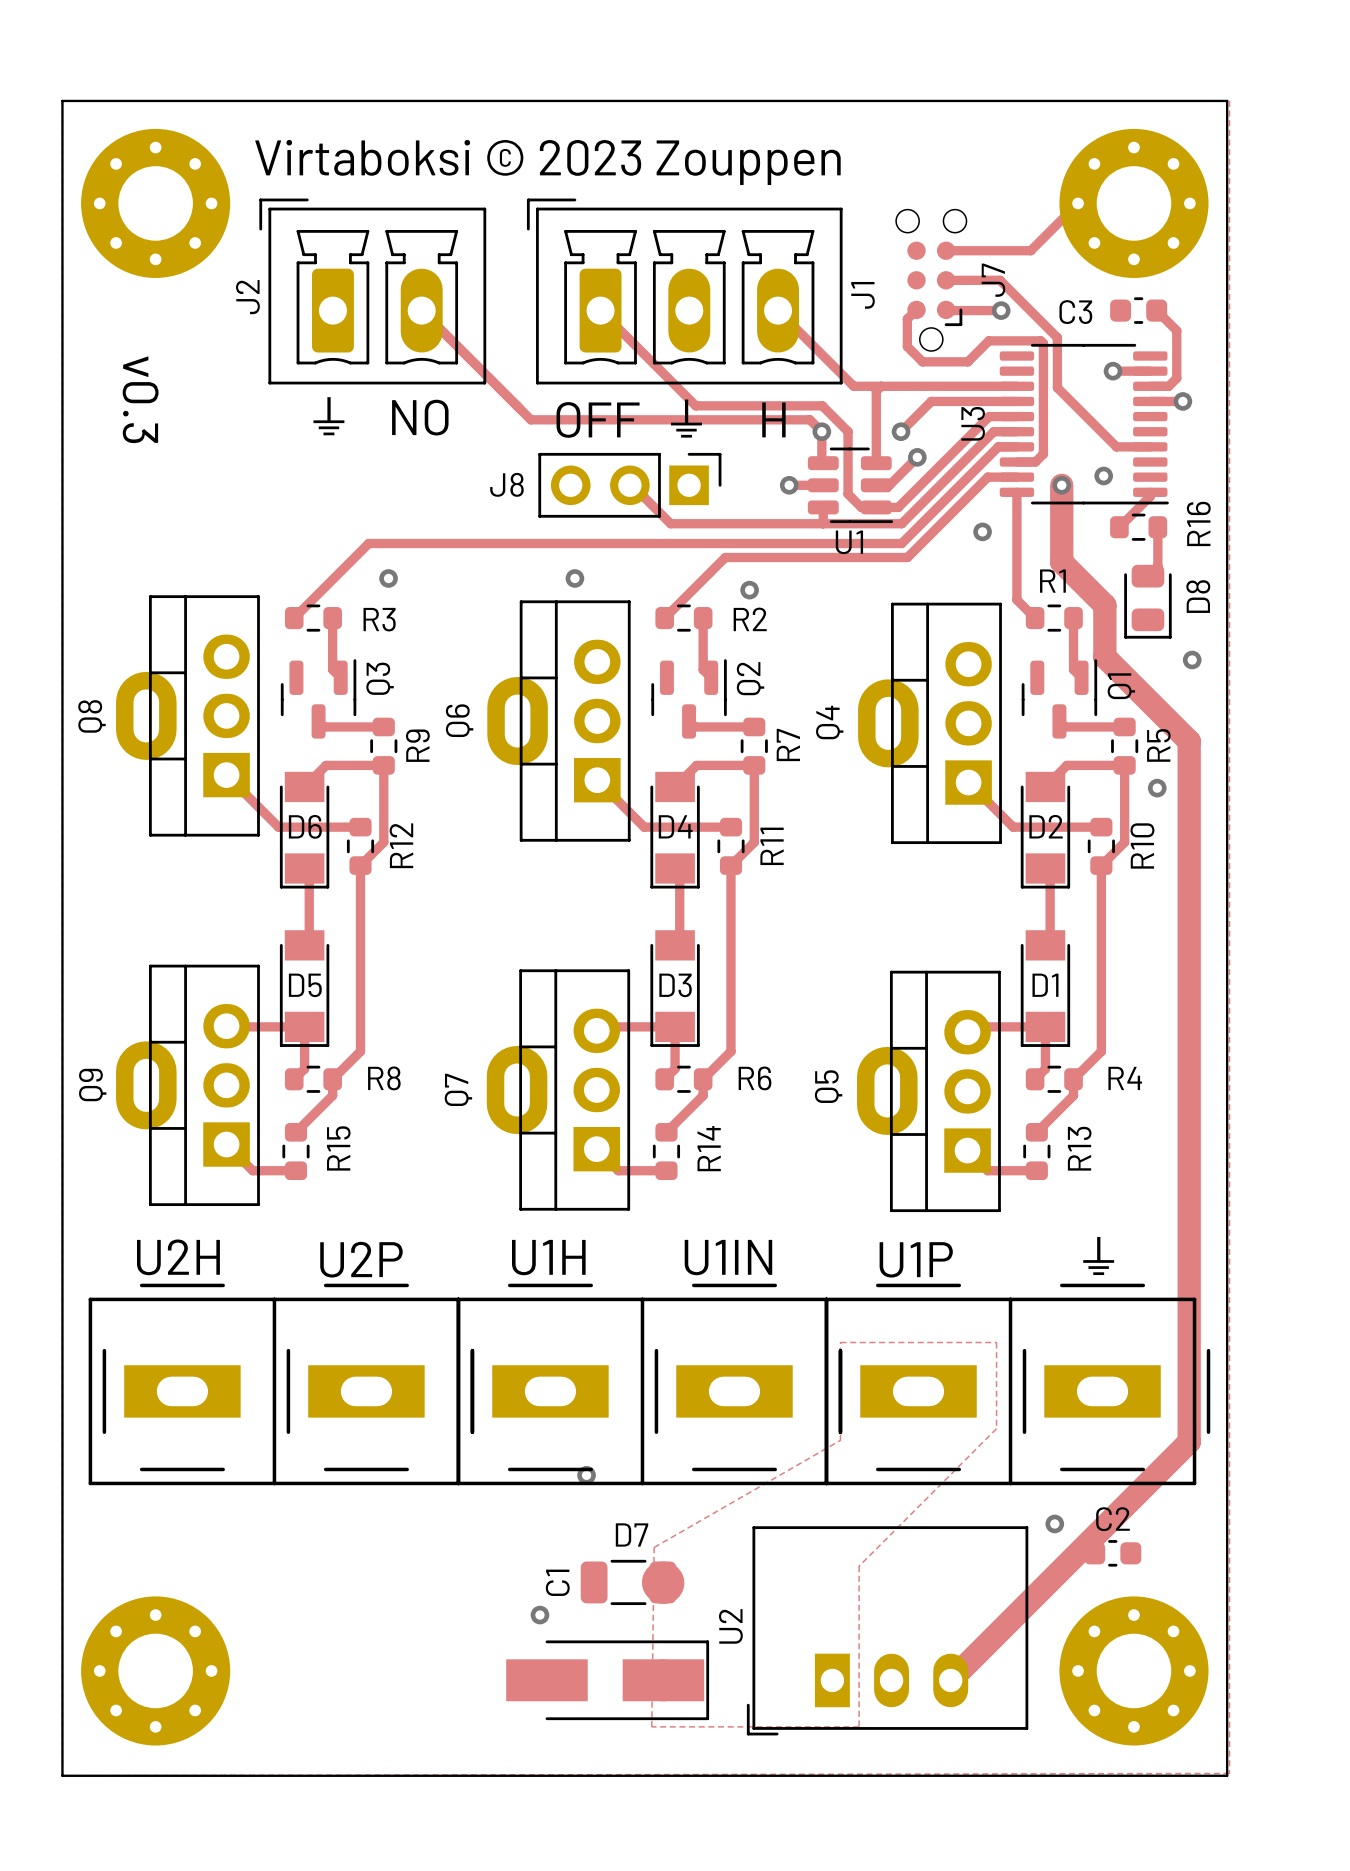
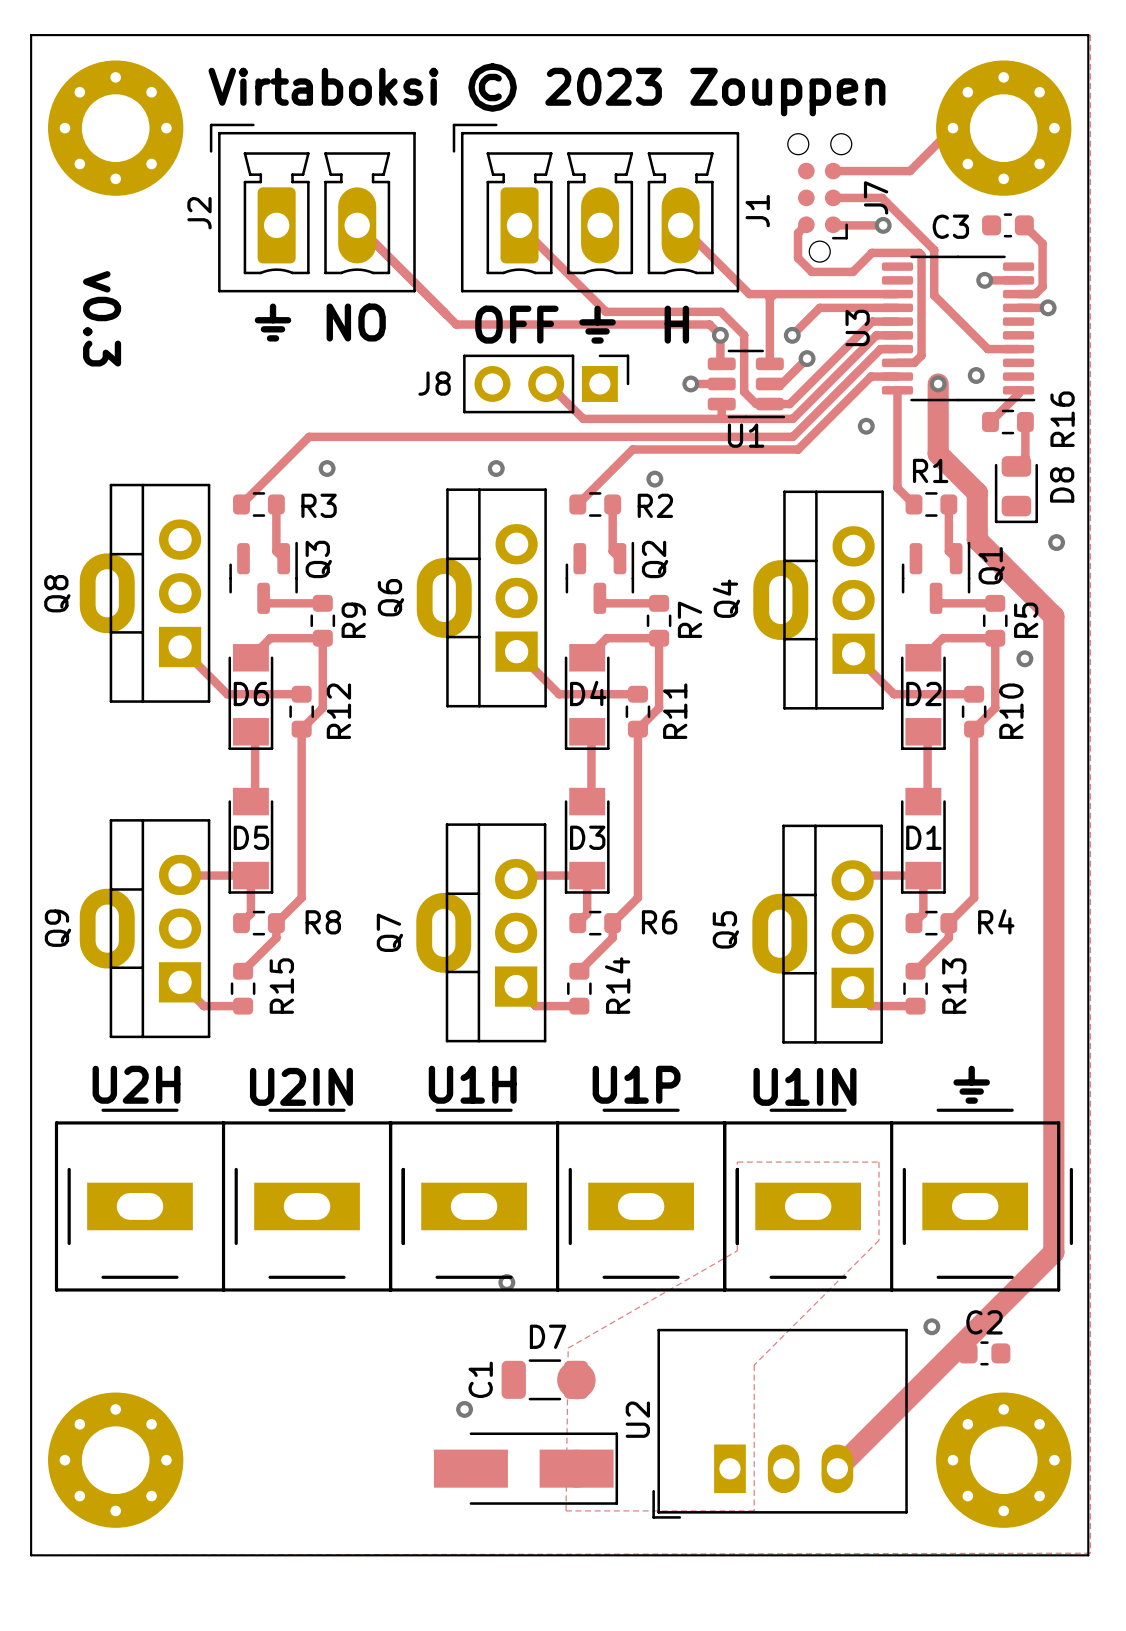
text: U1IN (728, 1257) -> U1P (636, 1084)
text: U2P (361, 1259) -> U2IN (301, 1086)
text: U1P (916, 1259) -> U1IN (804, 1086)

